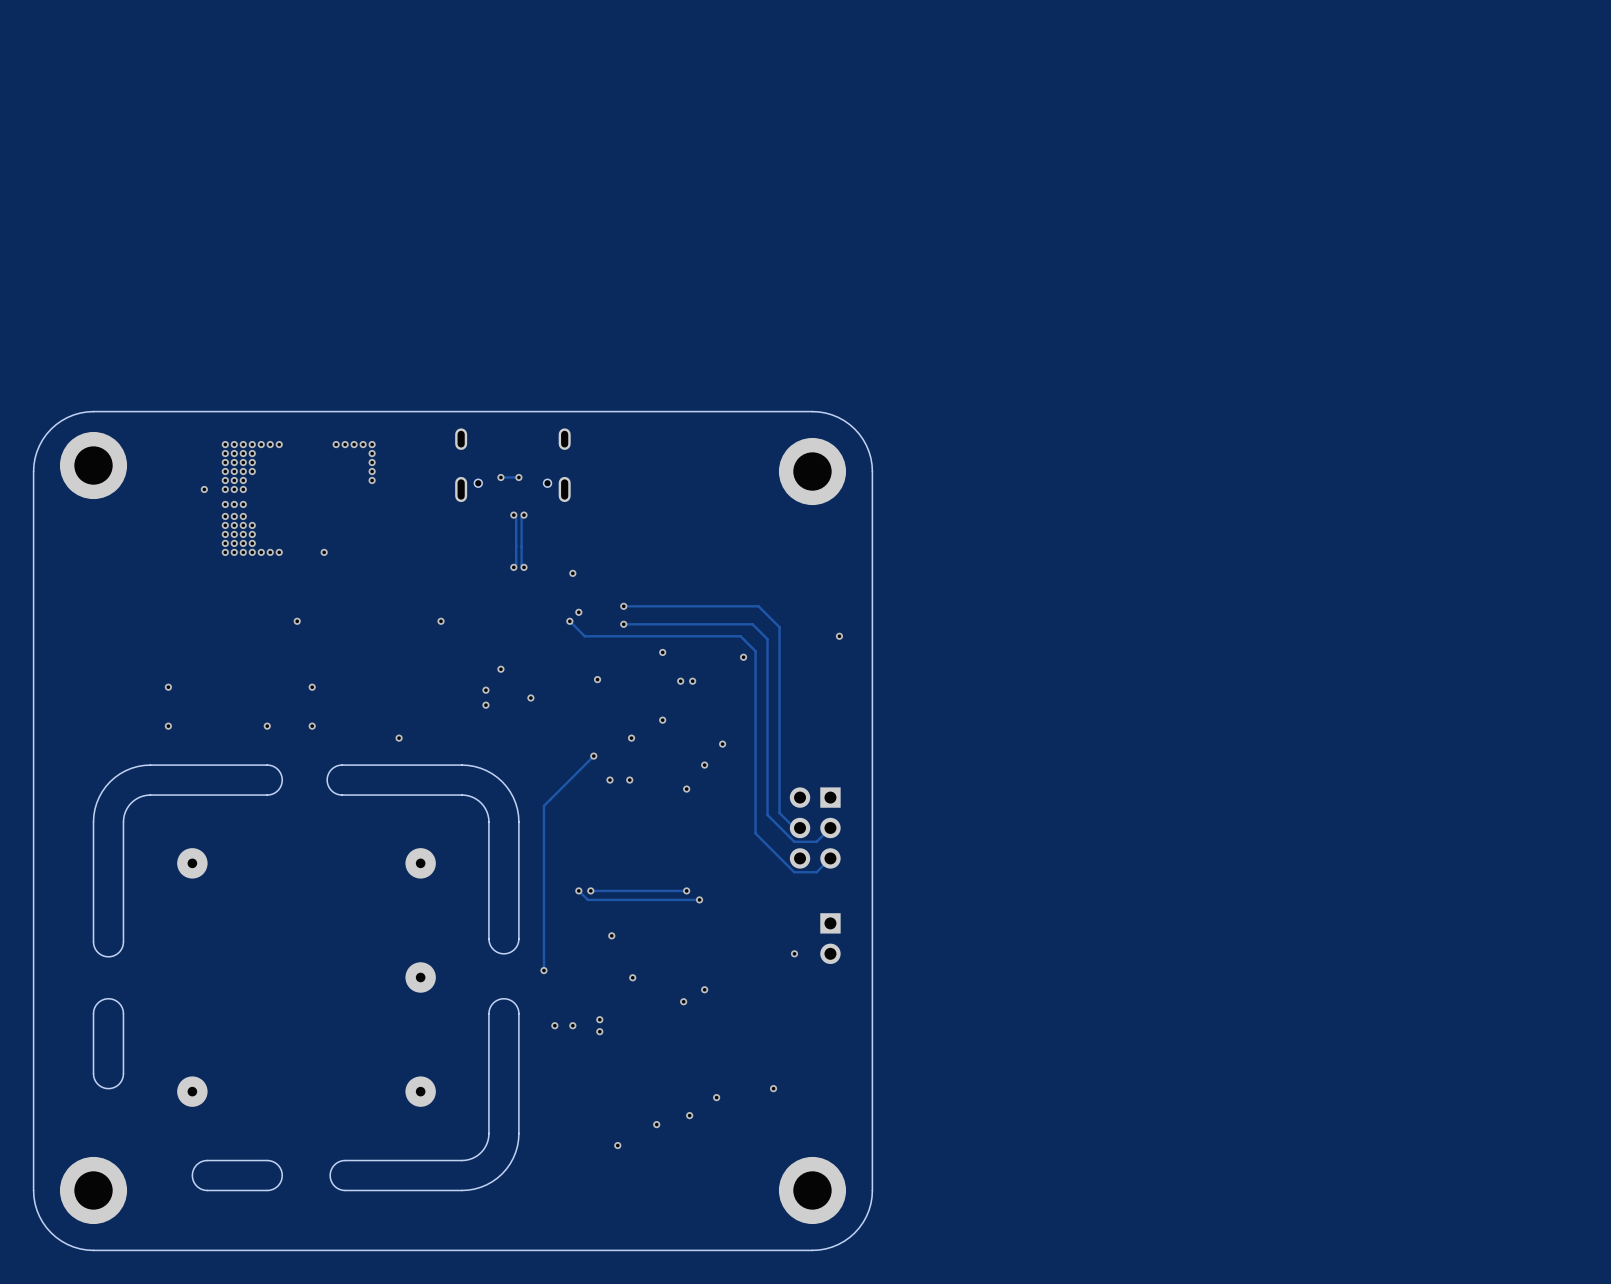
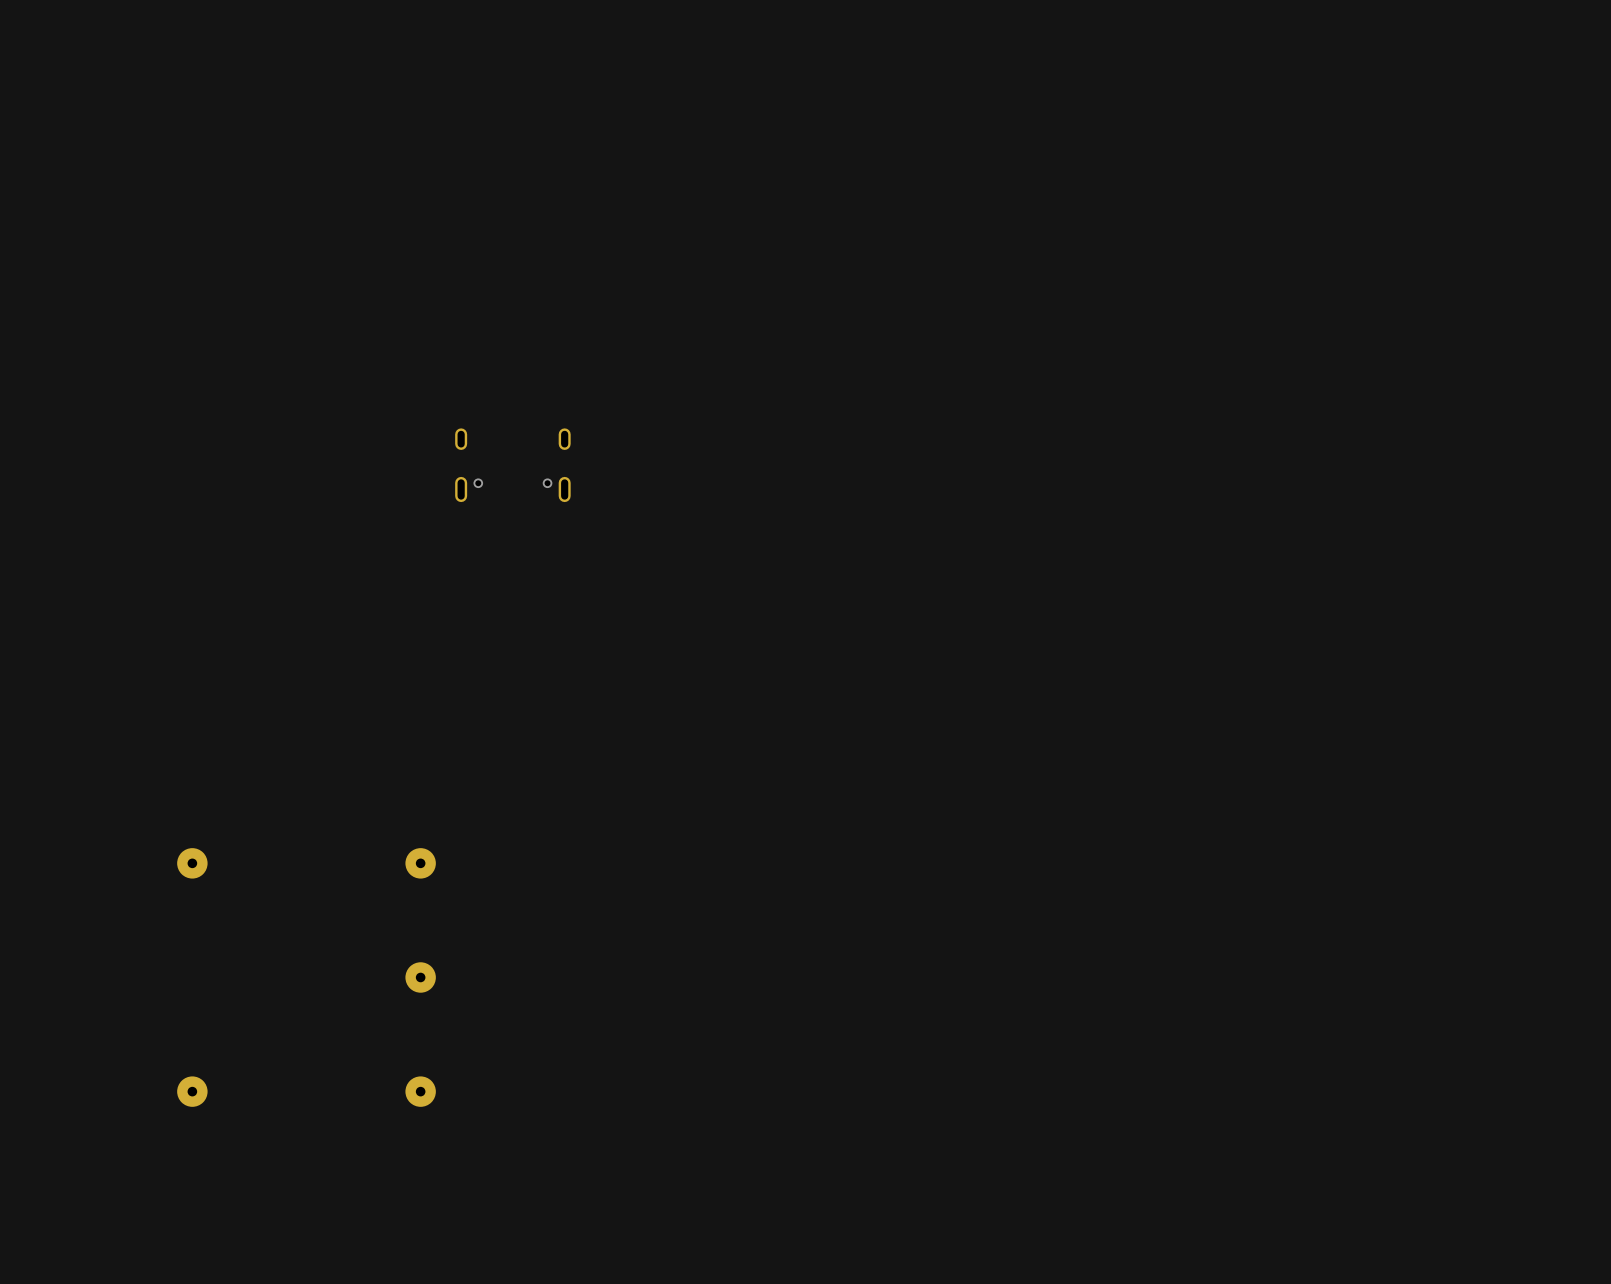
board edge: (812, 411) (93, 411) (80, 413) (67, 417) (51, 429) (42, 439) (36, 451) (33, 471) (33, 1190) (35, 1203) (39, 1216) (51, 1232) (67, 1244) (80, 1248) (93, 1250) (812, 1250) (825, 1248) (838, 1244) (854, 1232) (863, 1222) (869, 1210) (872, 1190) (872, 471) (869, 451) (863, 439) (854, 429) (838, 417) (825, 413) (812, 411) -> none
via: (225, 444) -> none
via: (234, 444) -> none
via: (243, 444) -> none
via: (252, 444) -> none
via: (261, 444) -> none
via: (270, 444) -> none
via: (279, 444) -> none
via: (336, 444) -> none
via: (345, 444) -> none
via: (354, 444) -> none
via: (363, 444) -> none
via: (372, 444) -> none
via: (225, 453) -> none
via: (234, 453) -> none
via: (243, 453) -> none
via: (252, 453) -> none
via: (372, 453) -> none
via: (225, 462) -> none
via: (234, 462) -> none
via: (243, 462) -> none
via: (252, 462) -> none
via: (372, 462) -> none
part: (93, 465) -> none
via: (225, 471) -> none
via: (234, 471) -> none
via: (243, 471) -> none
via: (252, 471) -> none
via: (372, 471) -> none
part: (812, 471) -> none
via: (500, 477) -> none
track: (518, 477) (500, 477) -> none
via: (518, 477) -> none
via: (225, 480) -> none
via: (234, 480) -> none
via: (243, 480) -> none
via: (372, 480) -> none
via: (204, 489) -> none
via: (225, 489) -> none
via: (234, 489) -> none
via: (243, 489) -> none
via: (225, 504) -> none
via: (234, 504) -> none
via: (243, 504) -> none
track: (513, 515) (516, 517) (516, 546) -> none
via: (513, 515) -> none
track: (523, 515) (521, 517) (521, 546) -> none
via: (523, 515) -> none
via: (225, 516) -> none
via: (234, 516) -> none
via: (243, 516) -> none
via: (225, 525) -> none
via: (234, 525) -> none
via: (243, 525) -> none
via: (252, 525) -> none
via: (225, 534) -> none
via: (234, 534) -> none
via: (243, 534) -> none
via: (252, 534) -> none
via: (225, 543) -> none
via: (234, 543) -> none
via: (243, 543) -> none
via: (252, 543) -> none
track: (516, 546) (516, 564) (513, 567) -> none
track: (521, 546) (521, 564) (523, 567) -> none
via: (225, 552) -> none
via: (234, 552) -> none
via: (243, 552) -> none
via: (252, 552) -> none
via: (261, 552) -> none
via: (270, 552) -> none
via: (279, 552) -> none
via: (324, 552) -> none
via: (513, 567) -> none
via: (523, 567) -> none
via: (572, 573) -> none
track: (623, 606) (758, 606) (779, 627) (779, 813) (794, 828) (800, 828) -> none
via: (623, 606) -> none
via: (578, 612) -> none
via: (297, 621) -> none
via: (441, 621) -> none
track: (569, 621) (584, 636) (740, 636) (755, 651) (755, 833) (794, 872) (816, 872) (830, 858) -> none
via: (569, 621) -> none
track: (623, 624) (752, 624) (767, 639) (767, 815) (794, 841) (816, 841) (830, 828) -> none
via: (623, 624) -> none
via: (839, 636) -> none
via: (662, 652) -> none
via: (743, 657) -> none
via: (500, 669) -> none
via: (597, 679) -> none
via: (680, 681) -> none
via: (692, 681) -> none
via: (168, 687) -> none
via: (312, 687) -> none
via: (485, 690) -> none
via: (530, 697) -> none
via: (485, 705) -> none
via: (662, 720) -> none
via: (168, 726) -> none
via: (267, 726) -> none
via: (312, 726) -> none
via: (399, 738) -> none
via: (631, 738) -> none
via: (722, 744) -> none
track: (593, 756) (543, 805) (543, 970) -> none
via: (593, 756) -> none
board edge: (267, 765) (144, 765) (125, 770) (110, 781) (99, 797) (93, 815) (93, 941) (97, 952) (104, 956) (112, 956) (119, 952) (122, 945) (123, 822) (125, 811) (131, 802) (140, 797) (150, 795) (271, 794) (279, 789) (282, 778) (277, 769) (267, 765) -> none
board edge: (461, 765) (340, 765) (330, 770) (327, 782) (331, 790) (340, 794) (461, 795) (472, 797) (481, 802) (486, 811) (488, 822) (489, 940) (492, 947) (496, 951) (507, 953) (514, 949) (518, 940) (517, 809) (510, 791) (497, 777) (480, 768) (461, 765) -> none
via: (704, 765) -> none
via: (609, 780) -> none
via: (629, 780) -> none
via: (686, 789) -> none
part: (815, 828) -> none
track: (578, 890) (587, 899) (699, 899) -> none
via: (578, 890) -> none
via: (590, 890) -> none
track: (686, 890) (590, 890) -> none
via: (686, 890) -> none
via: (699, 899) -> none
via: (611, 935) -> none
part: (830, 938) -> none
via: (794, 953) -> none
via: (543, 970) -> none
via: (632, 977) -> none
via: (704, 989) -> none
via: (683, 1001) -> none
board edge: (123, 1013) (122, 1077) (115, 1086) (104, 1088) (96, 1082) (93, 1075) (94, 1009) (101, 1000) (110, 998) (120, 1004) (123, 1013) -> none
board edge: (518, 1013) (518, 1139) (513, 1158) (502, 1173) (486, 1184) (468, 1190) (345, 1190) (334, 1186) (330, 1179) (330, 1171) (334, 1164) (341, 1161) (461, 1160) (472, 1158) (481, 1152) (486, 1143) (488, 1133) (489, 1009) (496, 1000) (505, 998) (515, 1004) (518, 1013) -> none
via: (599, 1019) -> none
via: (554, 1025) -> none
via: (572, 1025) -> none
via: (599, 1031) -> none
via: (773, 1088) -> none
via: (716, 1097) -> none
via: (689, 1115) -> none
via: (656, 1124) -> none
via: (617, 1145) -> none
board edge: (267, 1160) (203, 1161) (194, 1168) (192, 1179) (196, 1186) (205, 1190) (271, 1189) (279, 1184) (282, 1173) (277, 1164) (267, 1160) -> none
part: (93, 1190) -> none
part: (812, 1190) -> none

